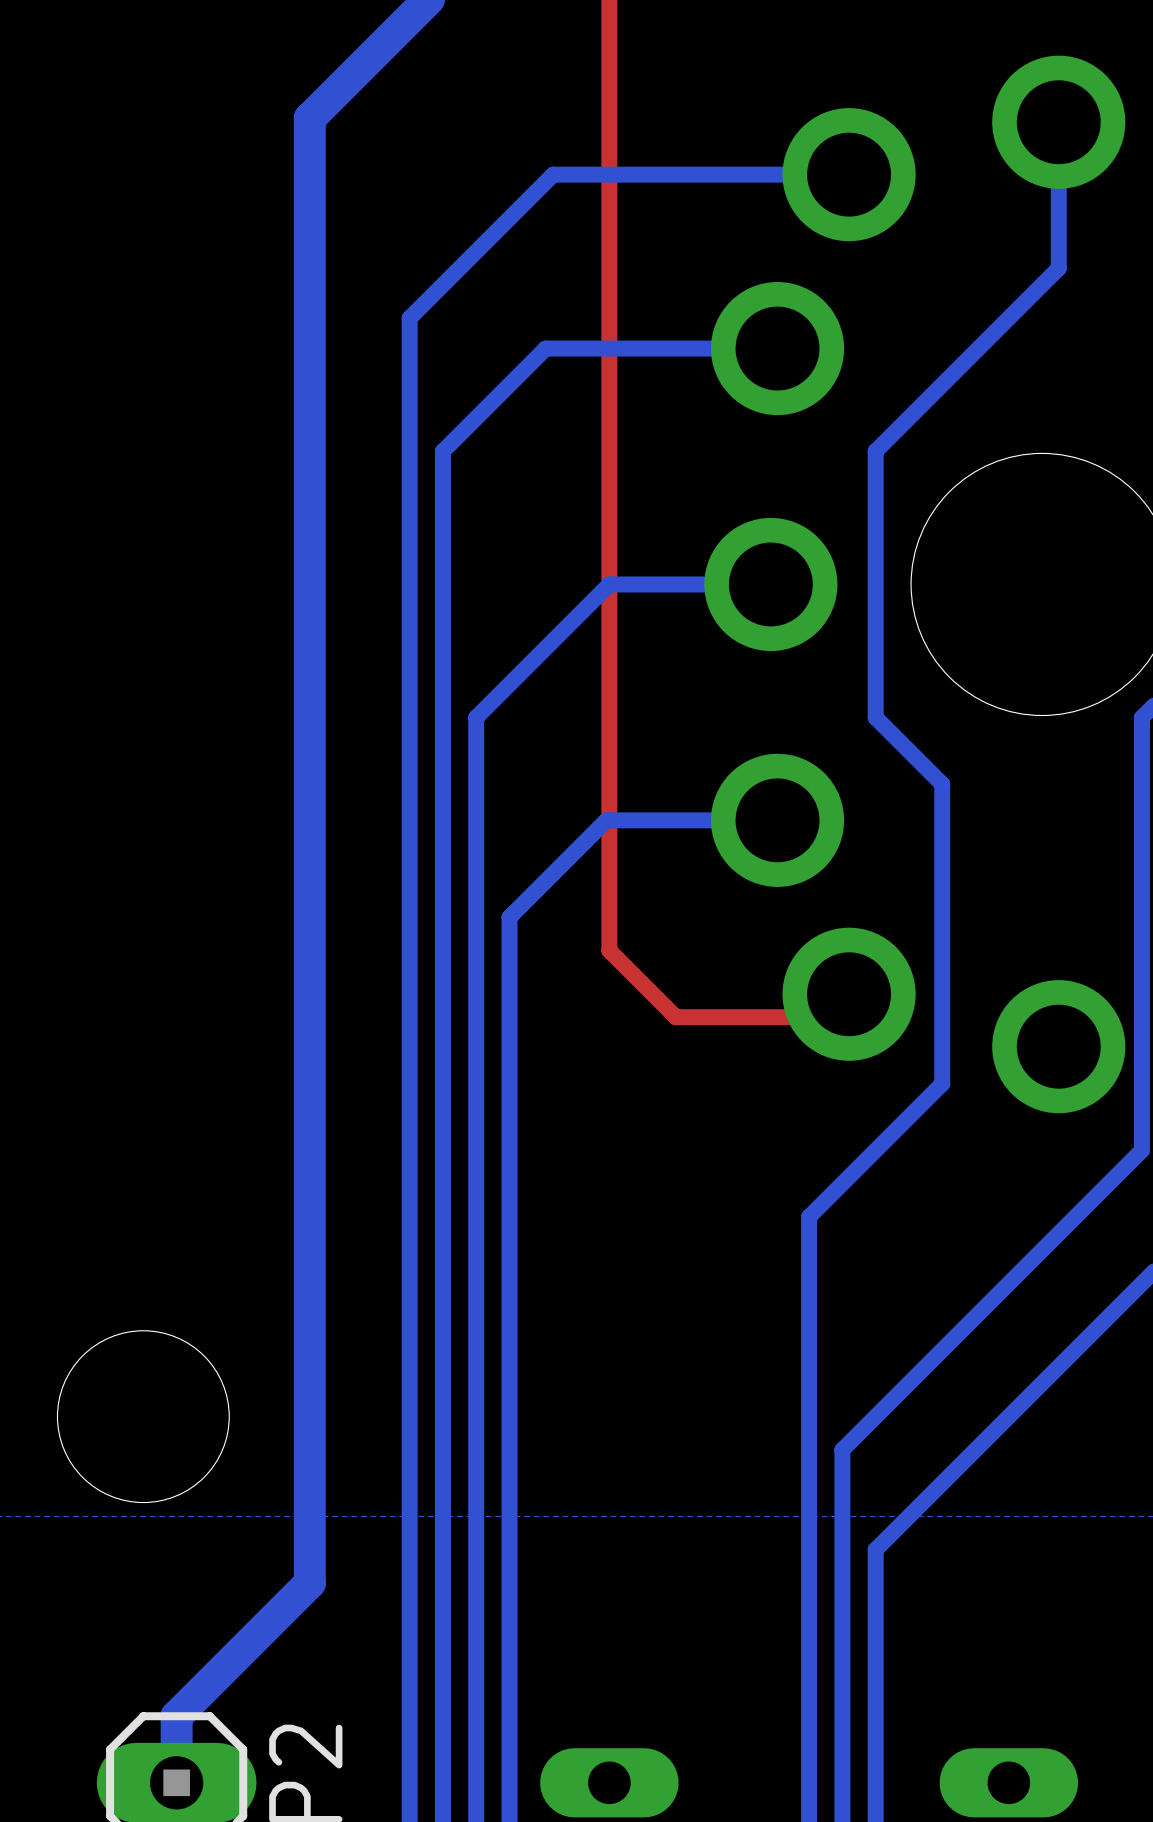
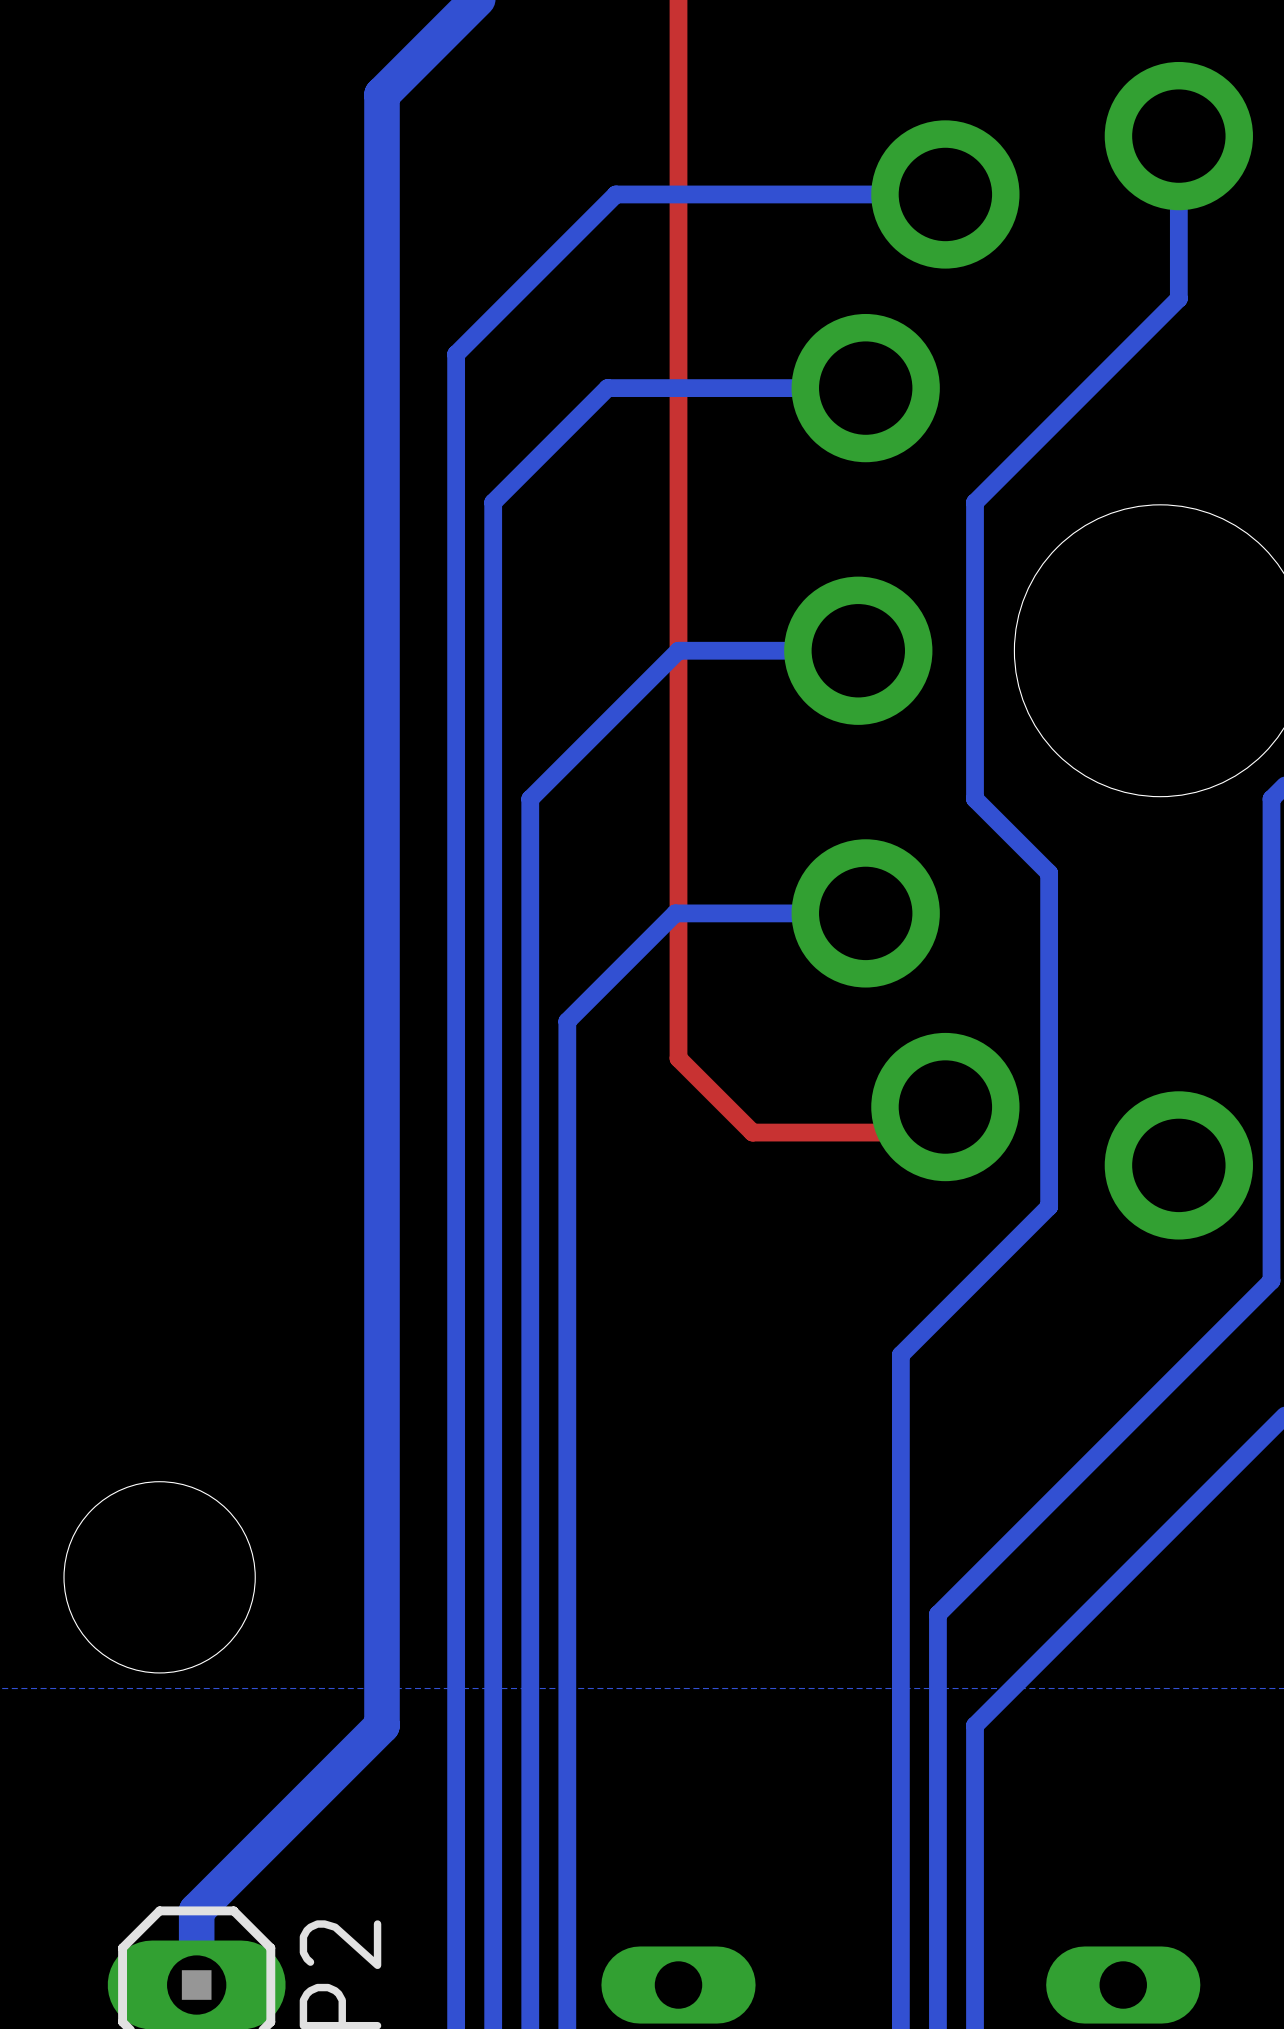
bottom track: (343, 85) (309, 118) (309, 1583) -> (382, 94) (382, 1725) (344, 1762)

